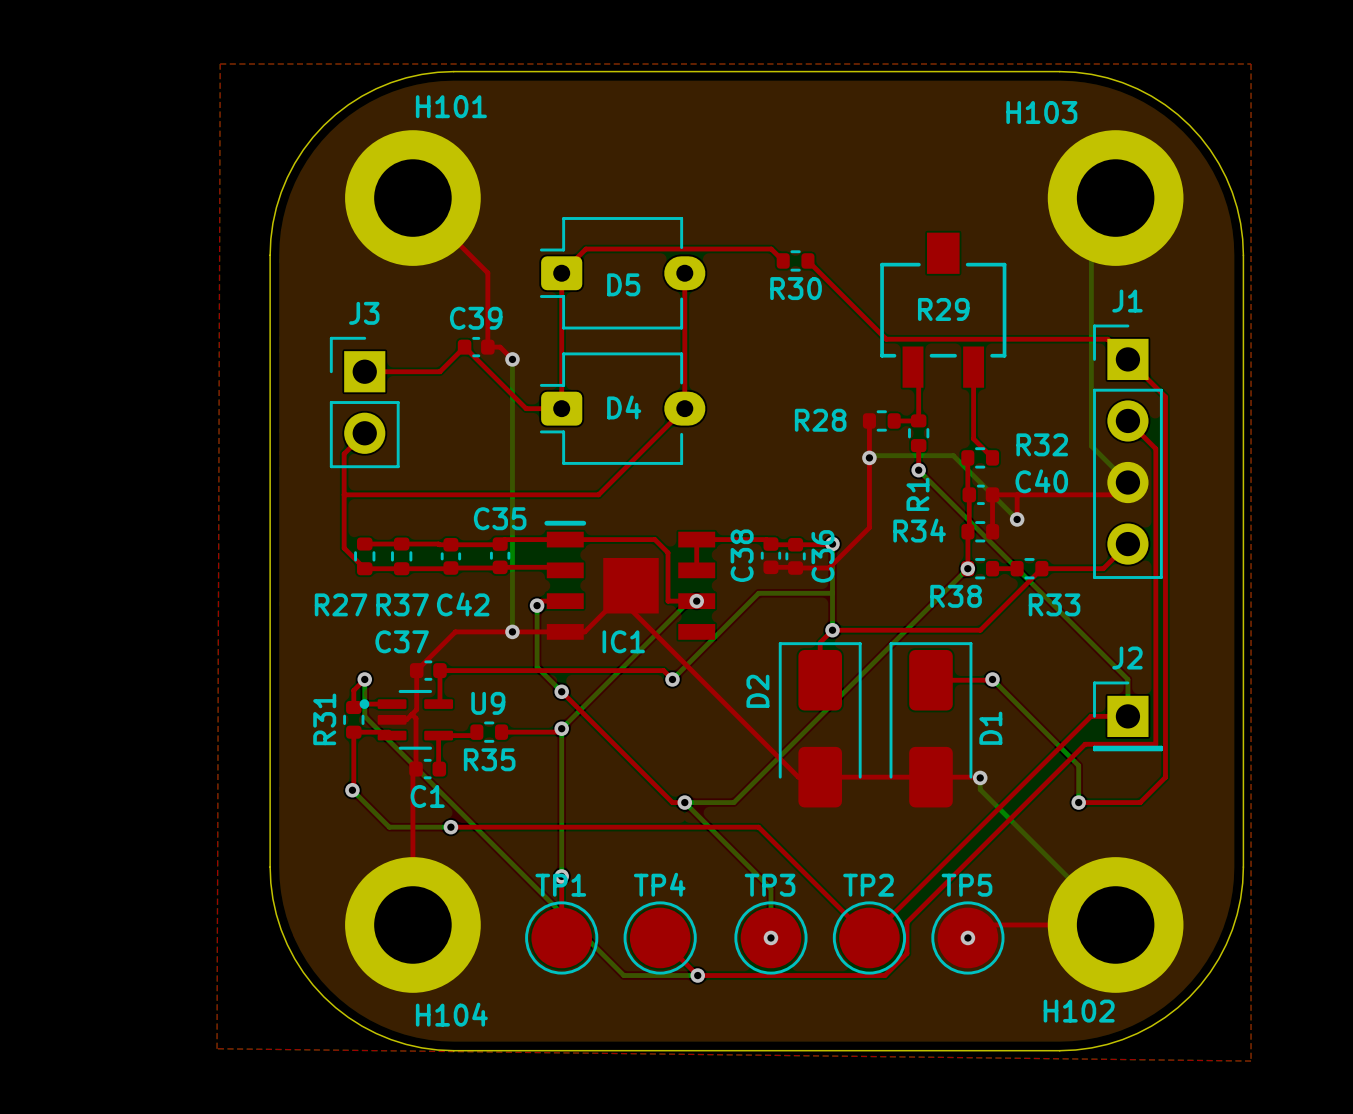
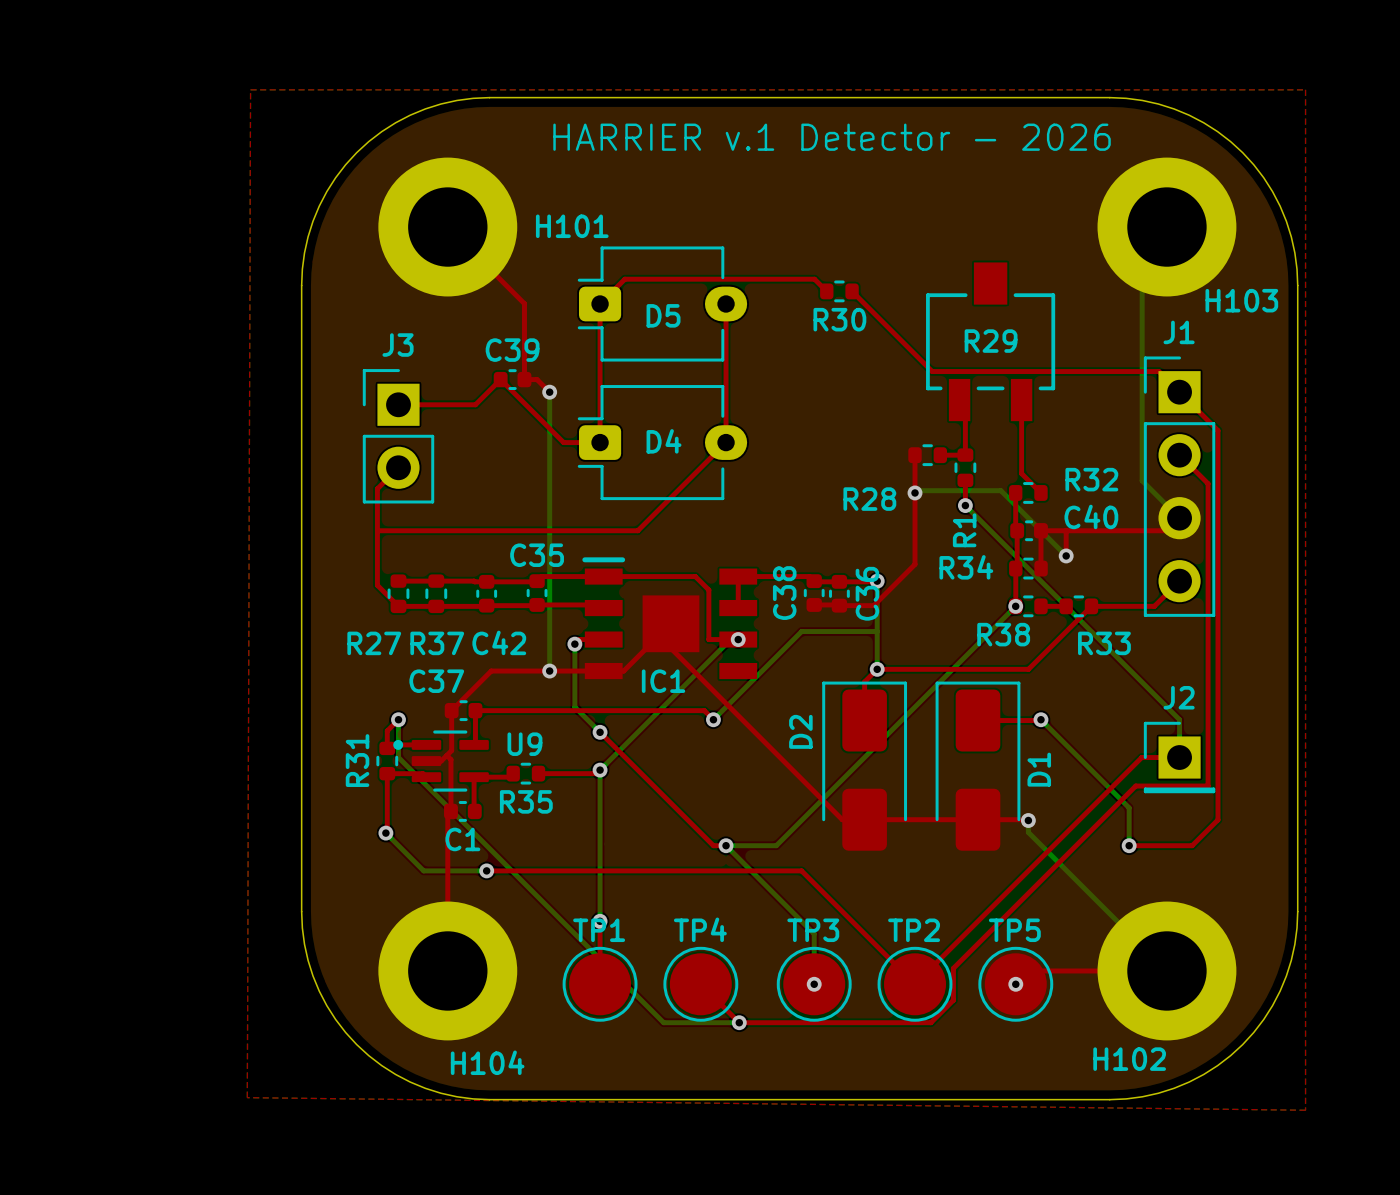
H101 name position: H101 (451, 106) -> H101 (572, 226)
text: none -> HARRIER v.1 Detector - 2026 (832, 137)
H103 name position: H103 (1041, 112) -> H103 (1241, 300)
R28 name position: R28 (820, 420) -> R28 (869, 499)

